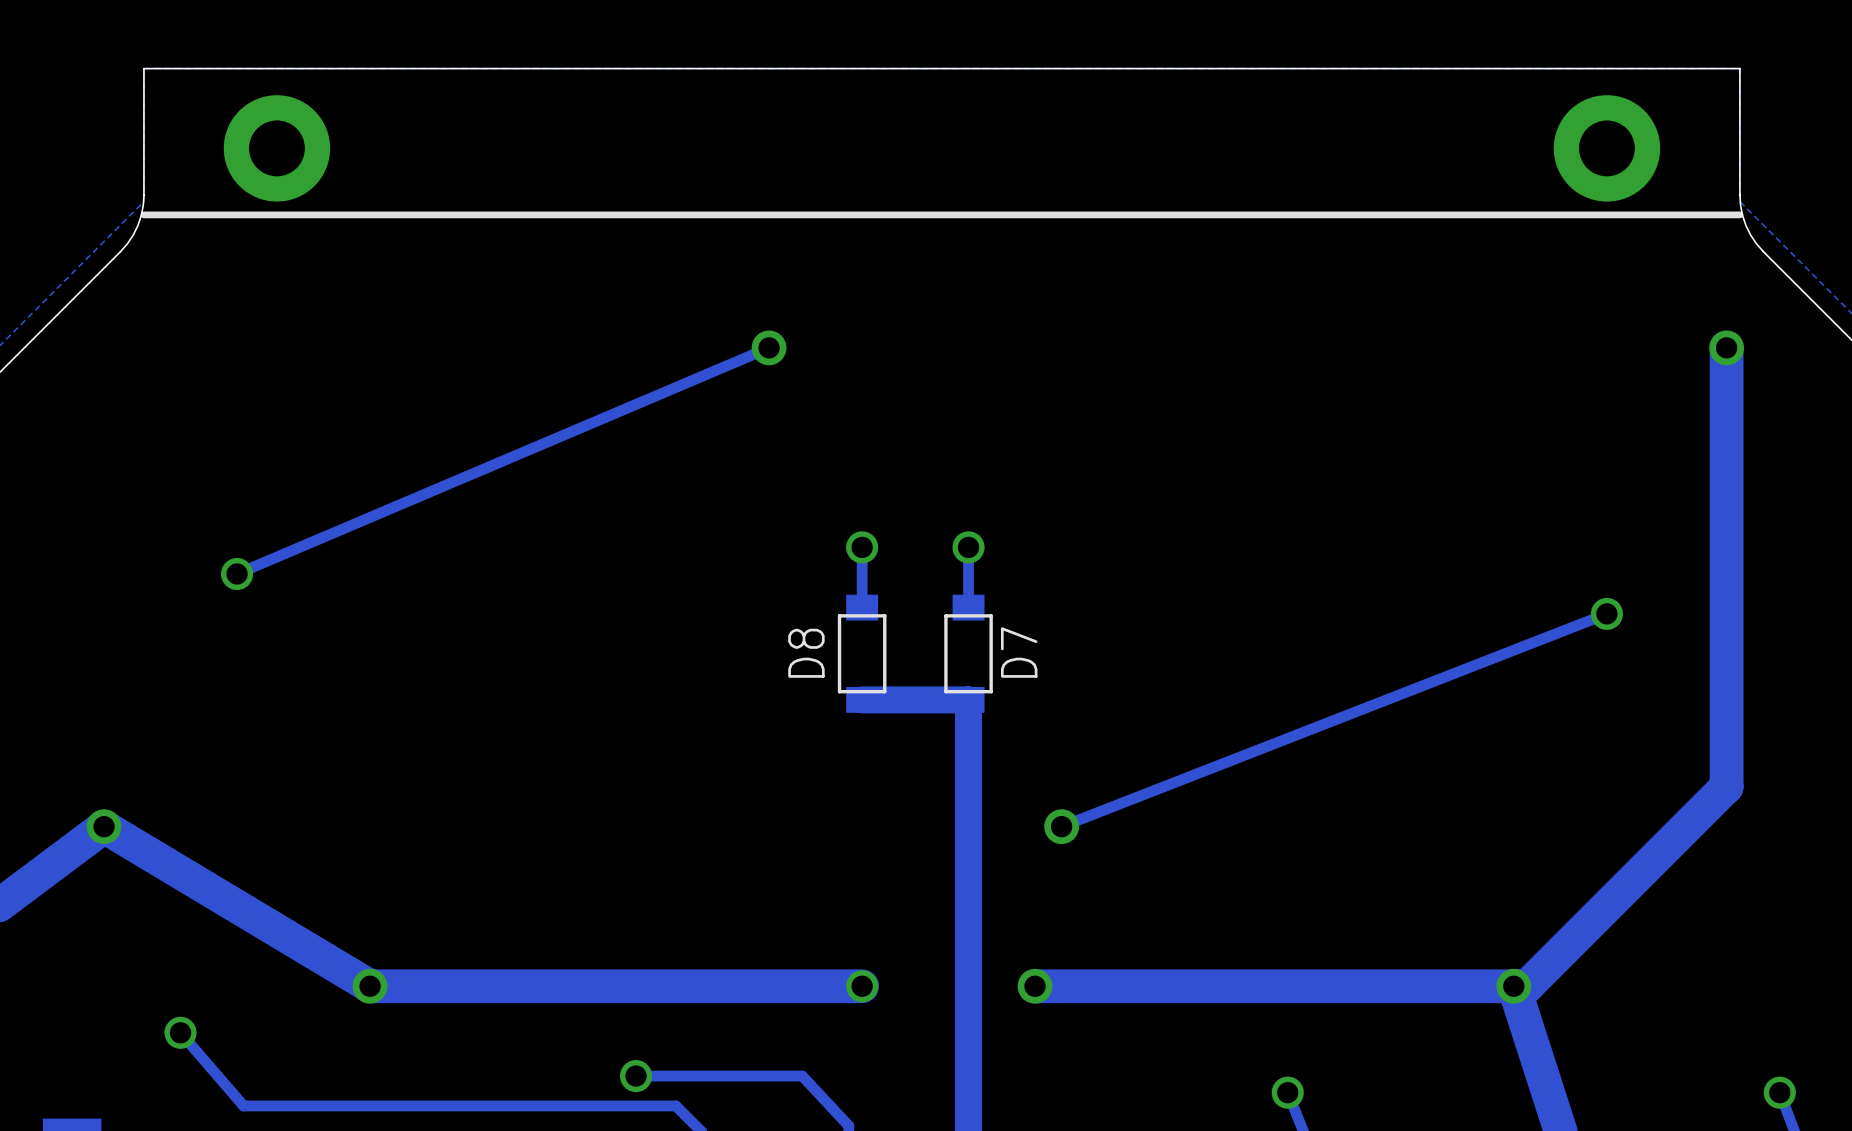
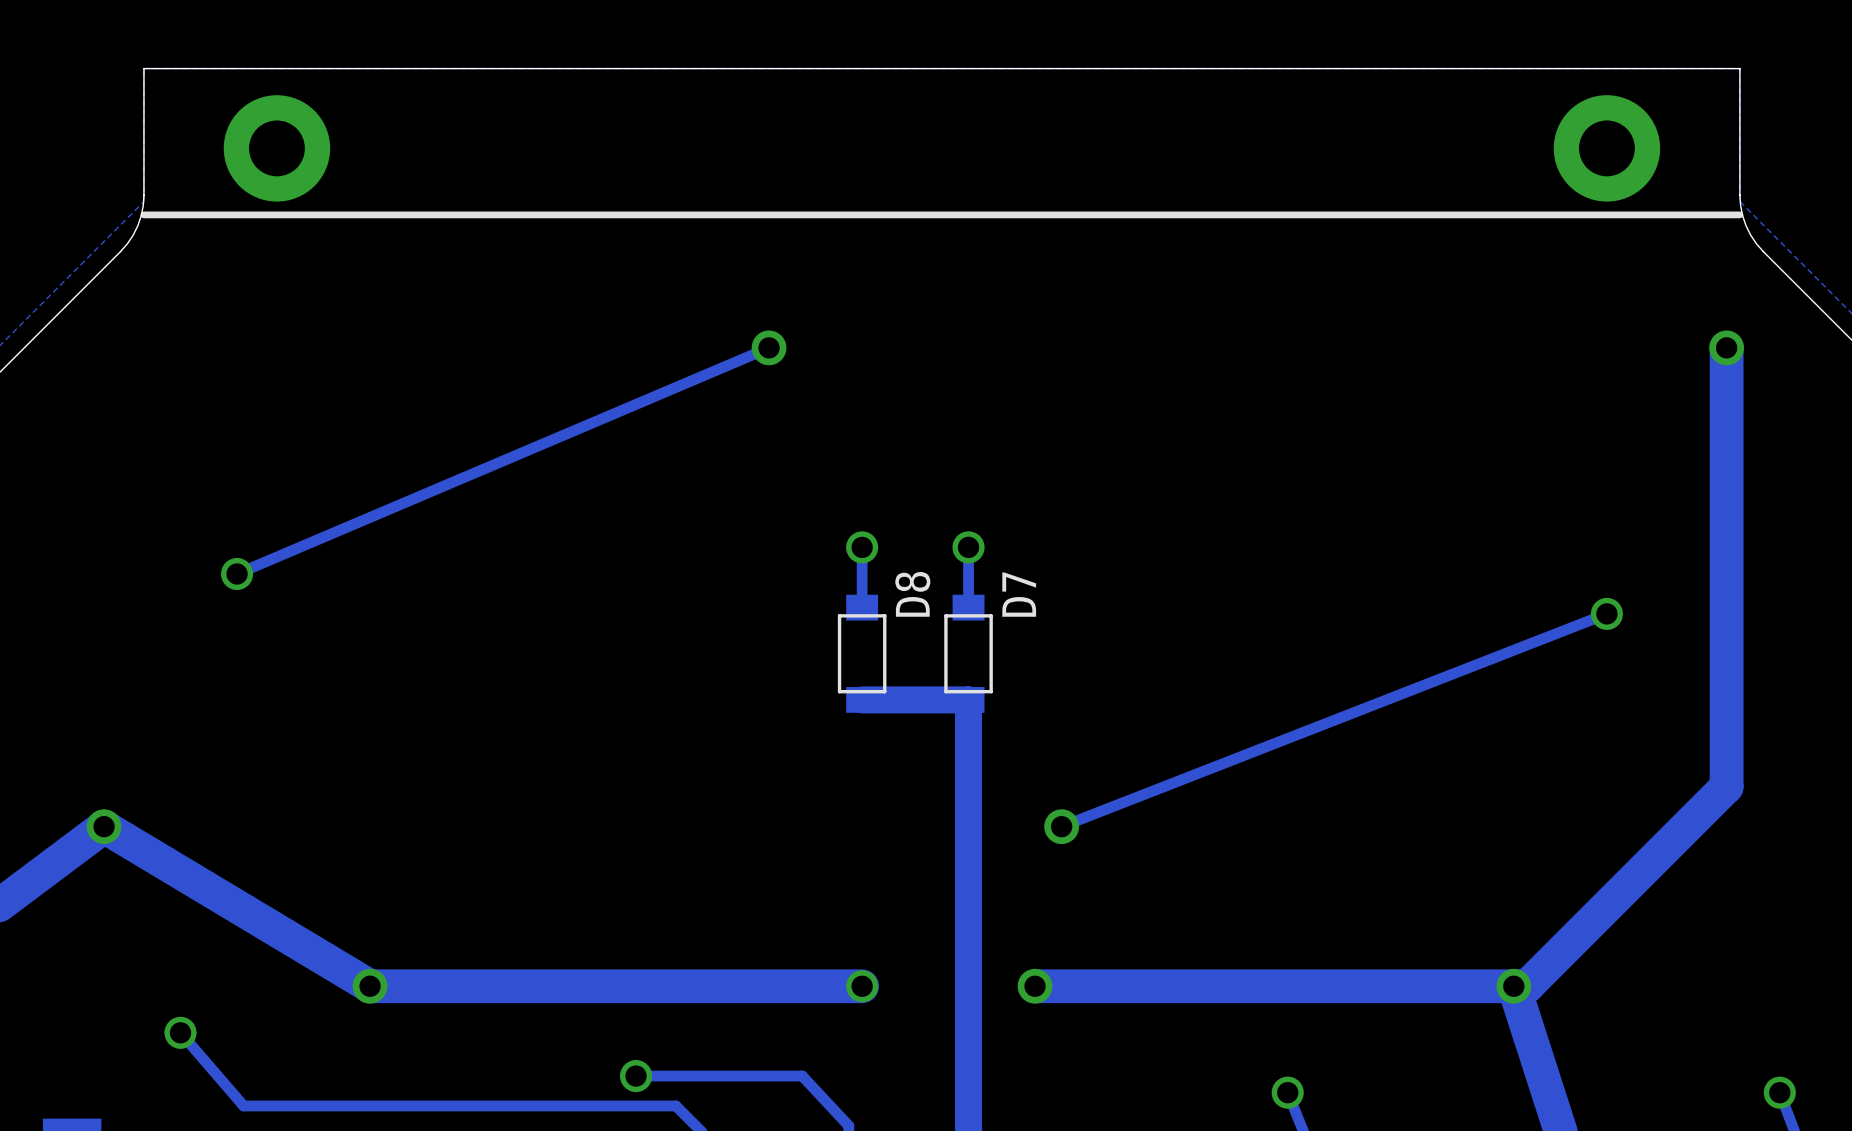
D7 name position: D7 (1019, 652) -> D7 (1019, 594)
D8 name position: D8 (806, 653) -> D8 (912, 594)

